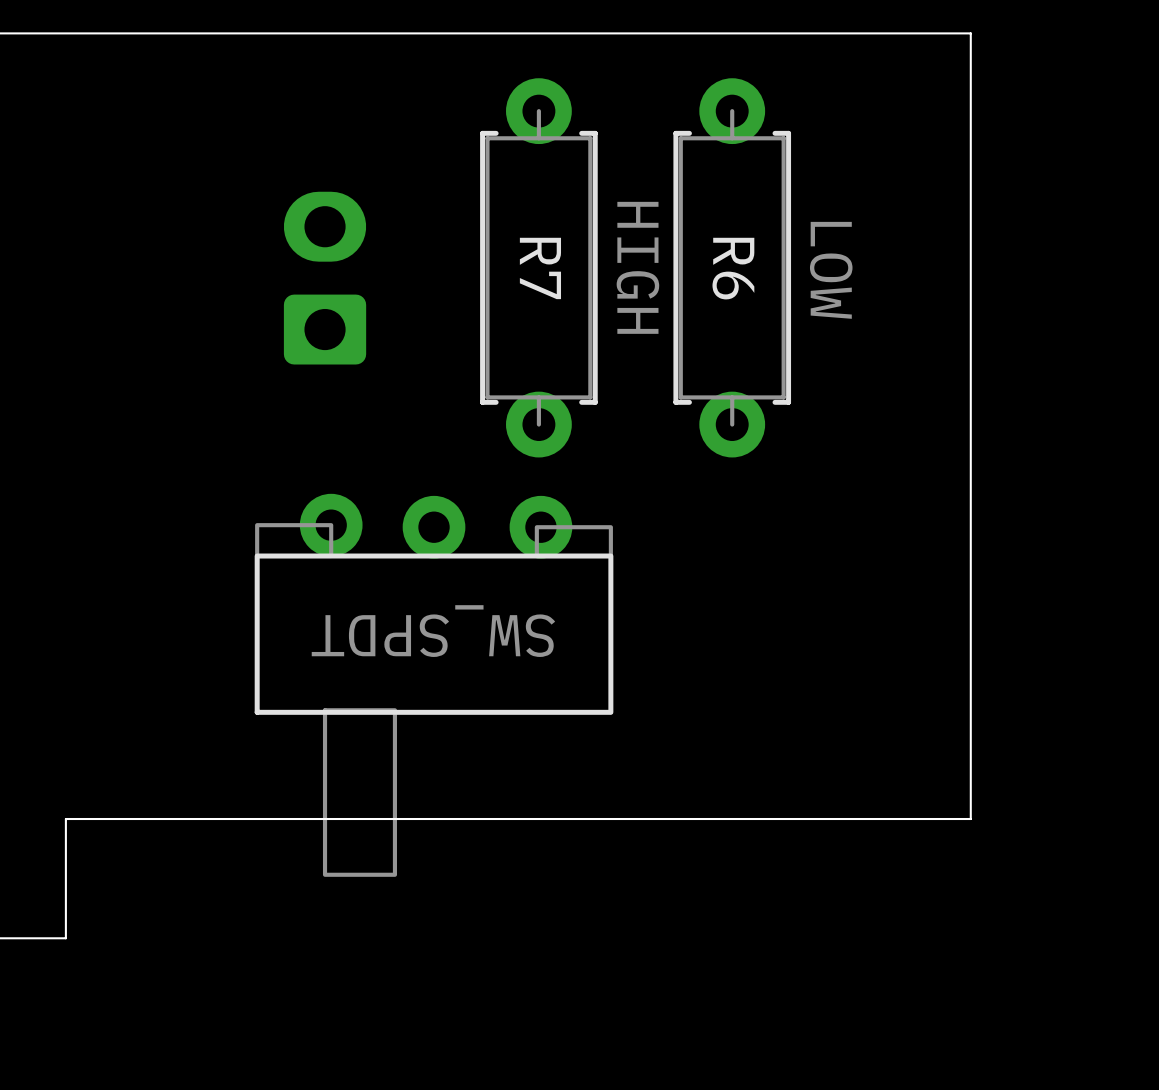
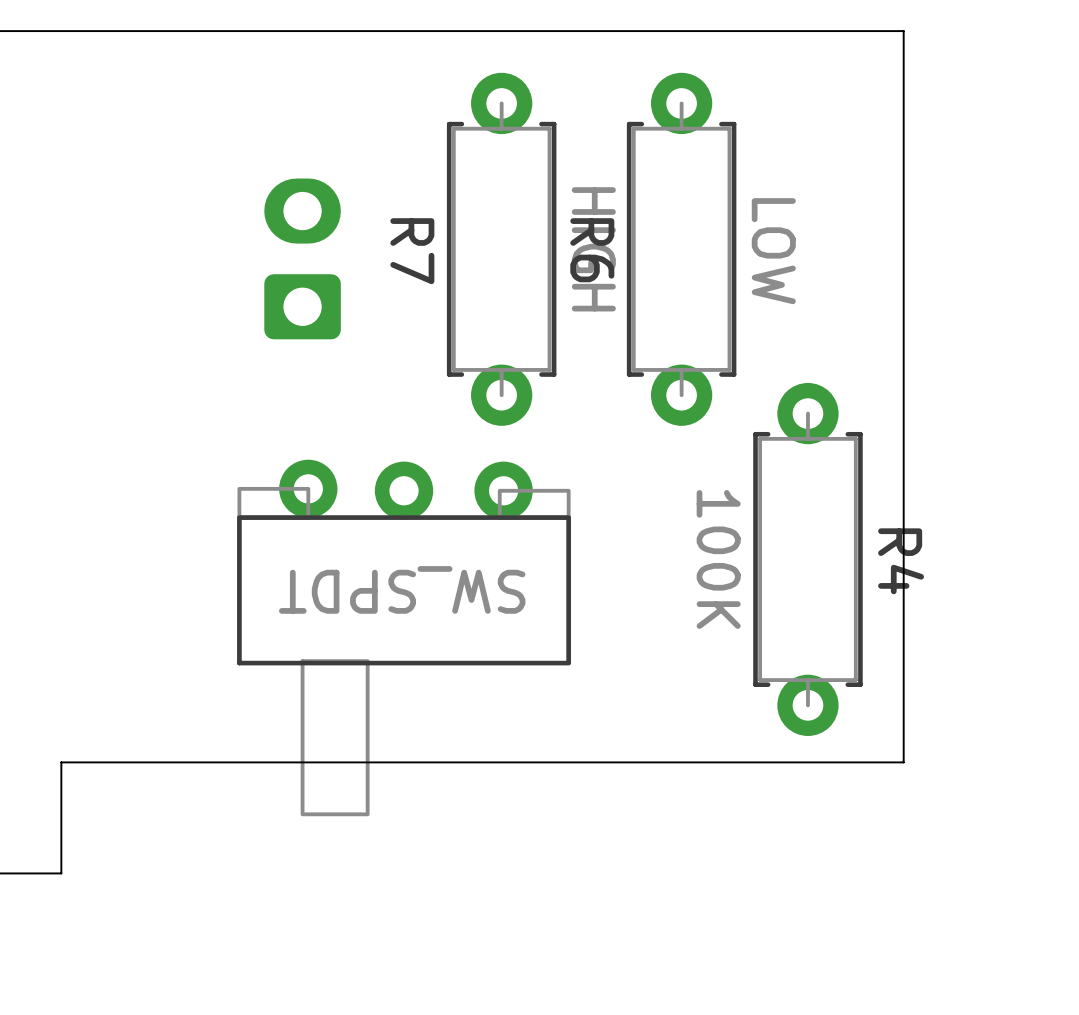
R7 name position: R7 (540, 268) -> R7 (412, 251)
R6 name position: R6 (733, 268) -> R6 (592, 250)
R4: none -> 100K (807, 559)

